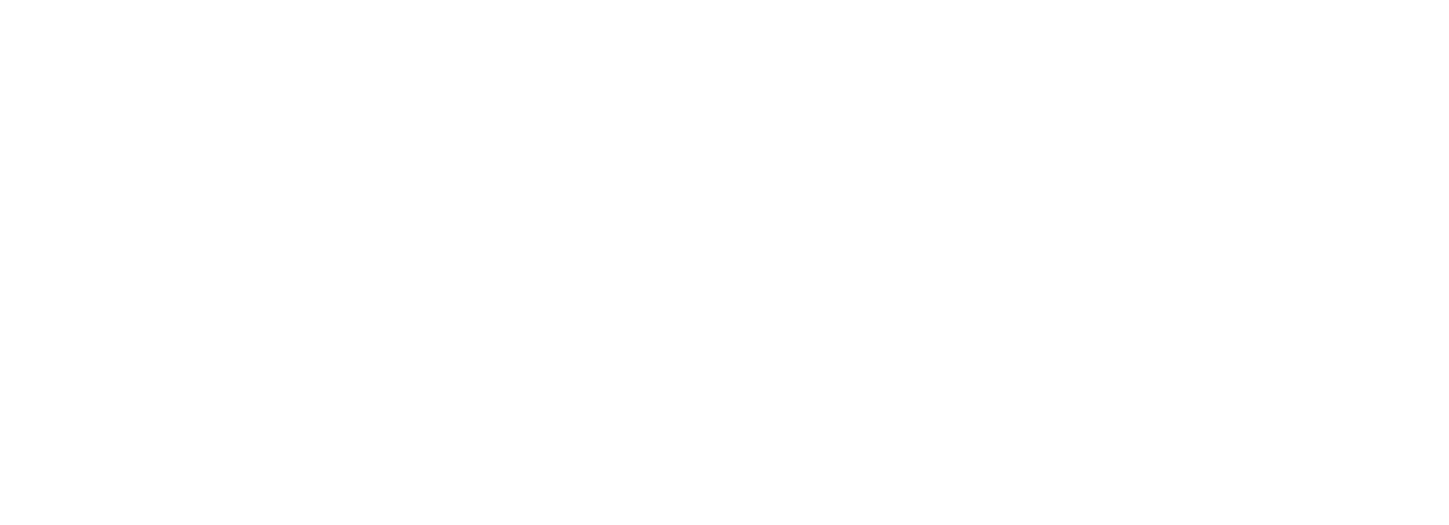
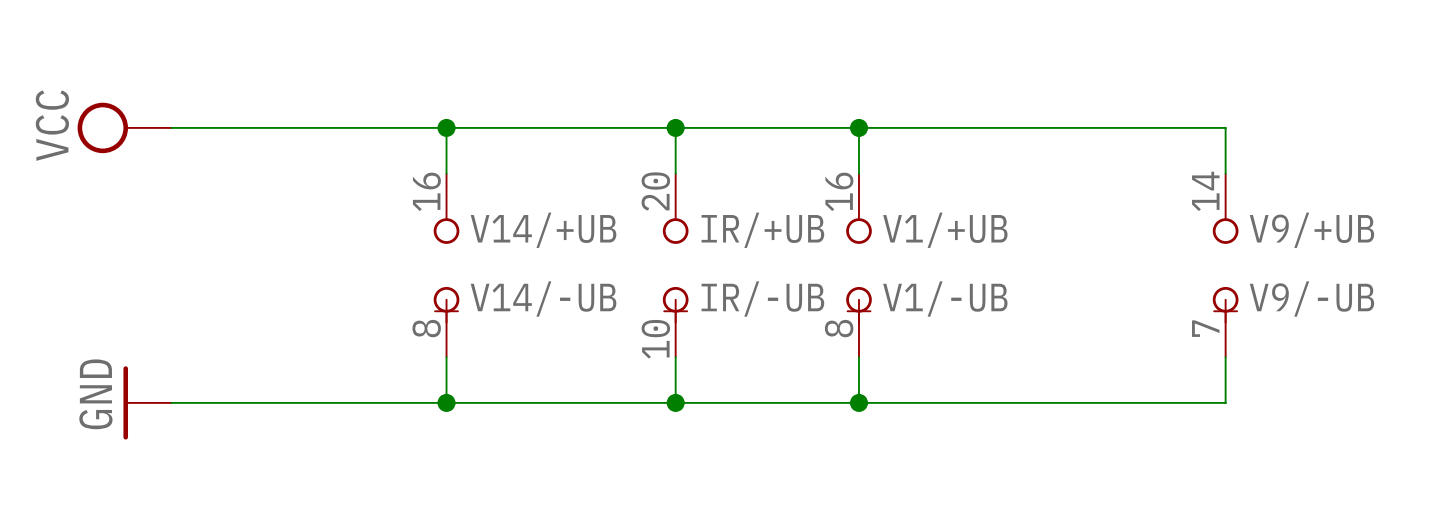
power symbol: none -> VCC (124, 127)
wire: none -> (171, 127) (1225, 127) (1225, 173)
wire: none -> (446, 127) (446, 173)
junction: none -> (446, 127)
wire: none -> (675, 127) (675, 173)
junction: none -> (675, 127)
wire: none -> (858, 127) (858, 173)
junction: none -> (858, 127)
V14/+UB: none -> (446, 208)
IR/+UB: none -> (675, 208)
V1/+UB: none -> (858, 208)
V9/+UB: none -> (1225, 208)
V14/-UB: none -> (446, 322)
IR/-UB: none -> (675, 322)
V1/-UB: none -> (858, 322)
V9/-UB: none -> (1225, 322)
wire: none -> (446, 357) (446, 402)
wire: none -> (675, 357) (675, 402)
wire: none -> (858, 357) (858, 402)
wire: none -> (1225, 357) (1225, 402) (171, 402)
power symbol: none -> GND (147, 402)
junction: none -> (446, 402)
junction: none -> (675, 402)
junction: none -> (858, 402)

